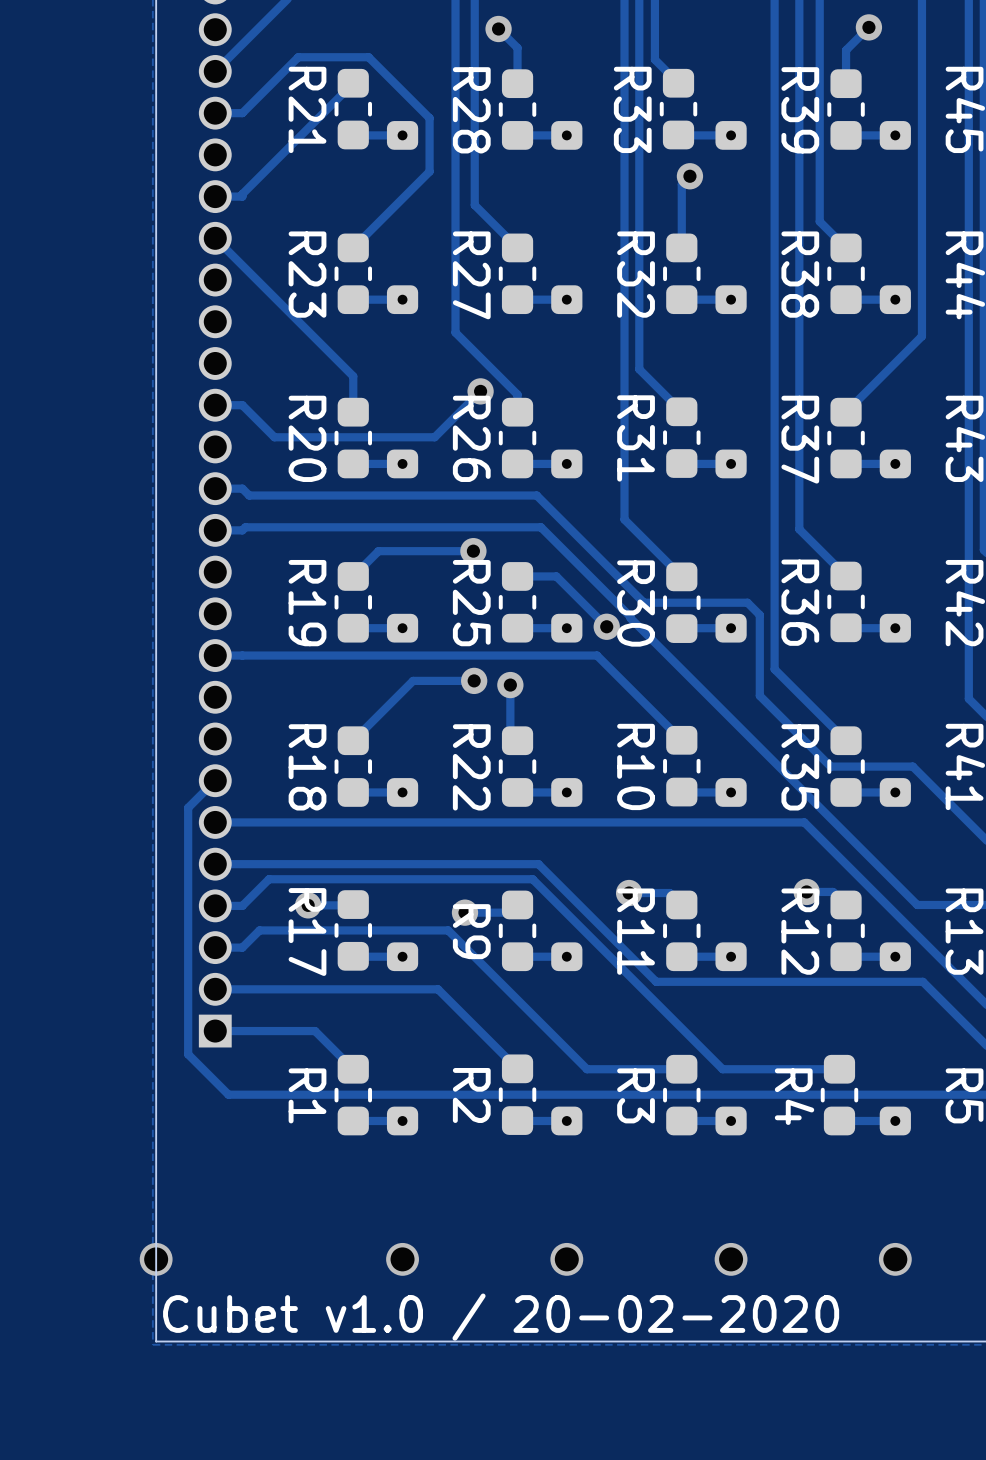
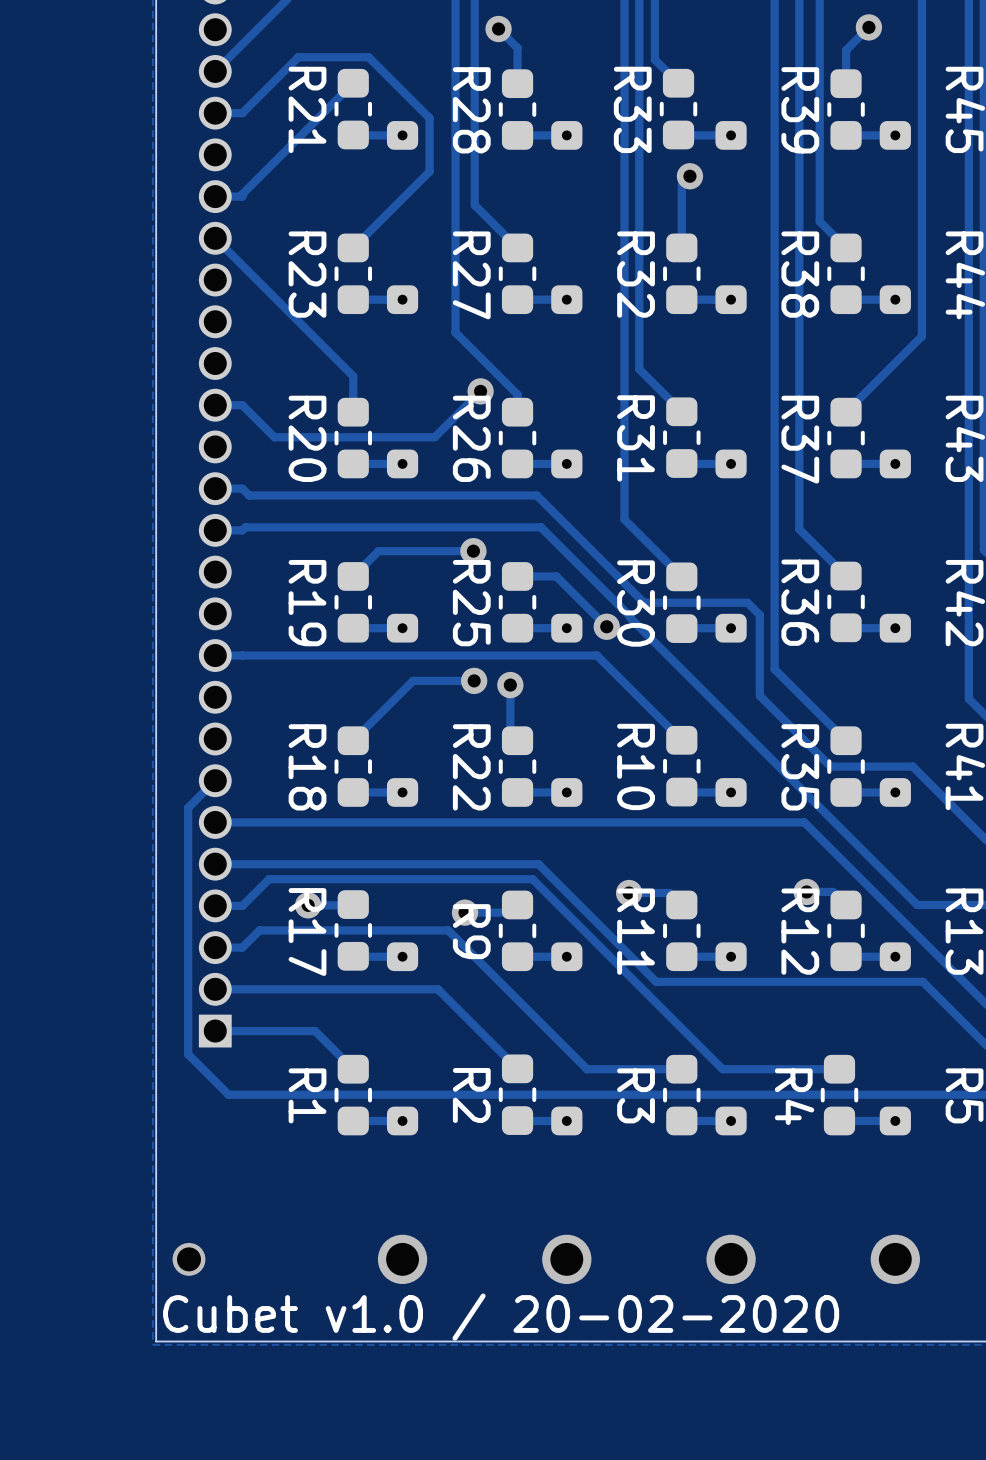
via size: [386, 1242, 419, 1276] -> [377, 1234, 428, 1285]
via size: [550, 1242, 584, 1276] -> [542, 1234, 592, 1285]
via size: [714, 1242, 748, 1276] -> [706, 1234, 756, 1285]
via size: [878, 1242, 912, 1276] -> [870, 1234, 920, 1285]
via position: (156, 1259) -> (189, 1259)

